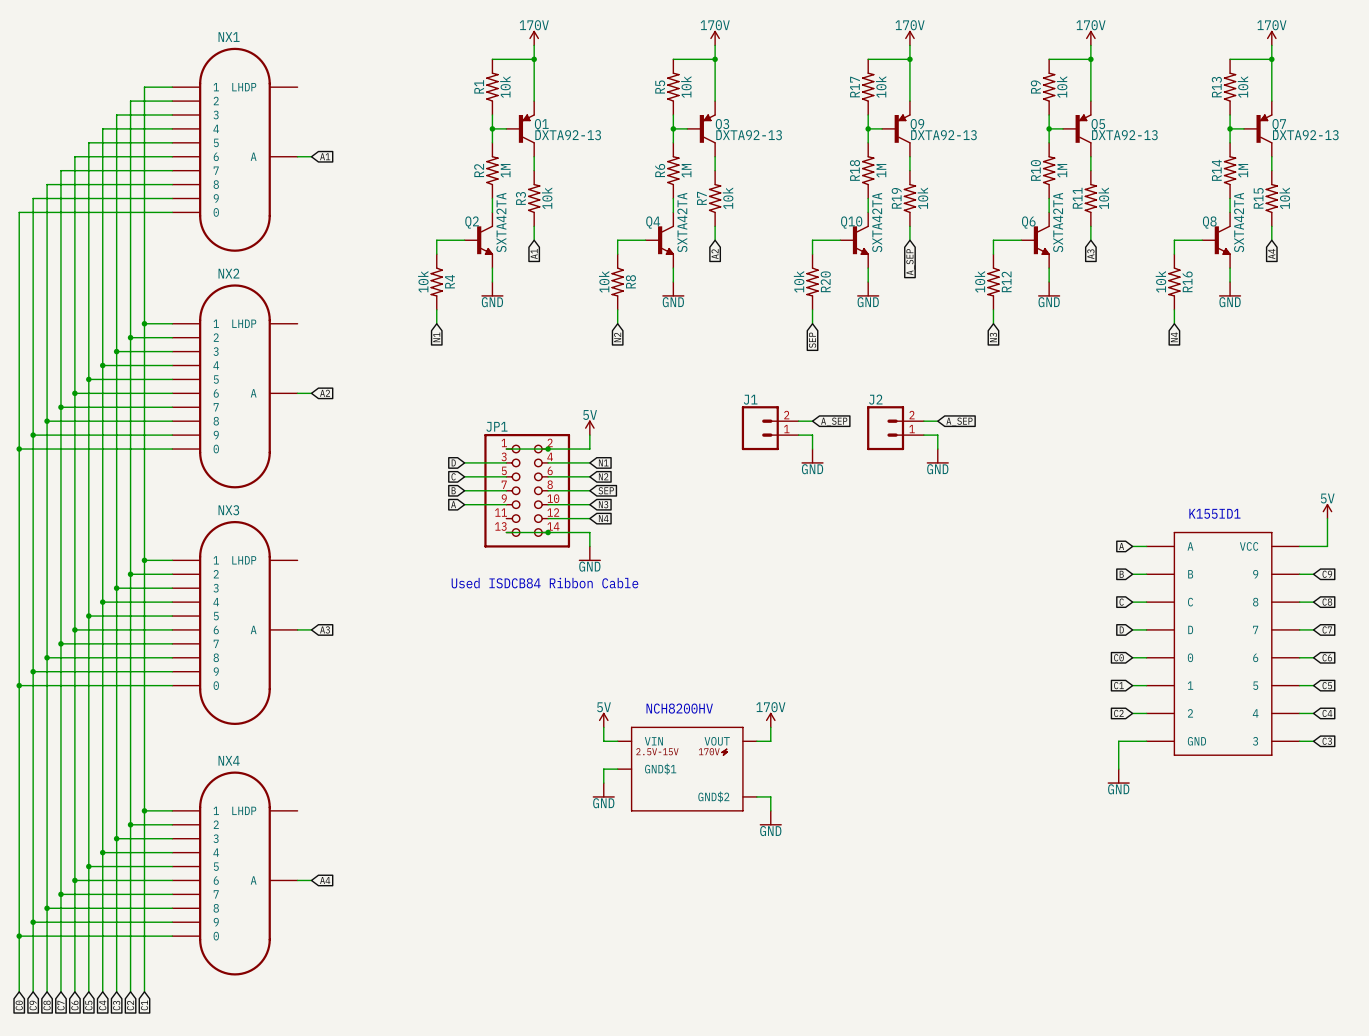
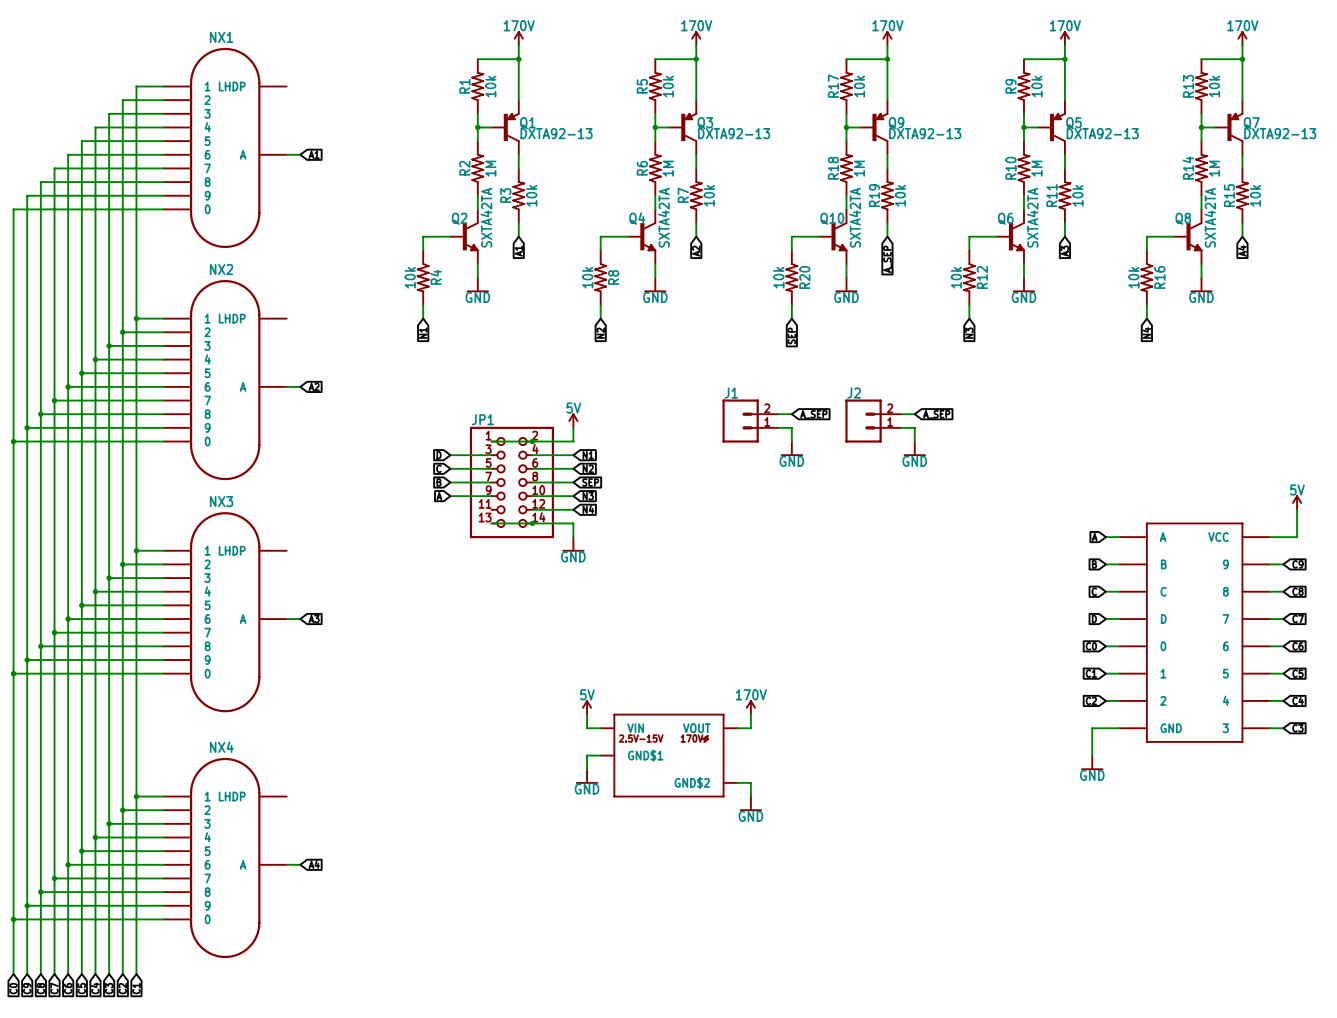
text: K155ID1 (1214, 513) -> none
text: Used ISDCB84 Ribbon Cable (544, 583) -> none
text: NCH8200HV (679, 708) -> none

